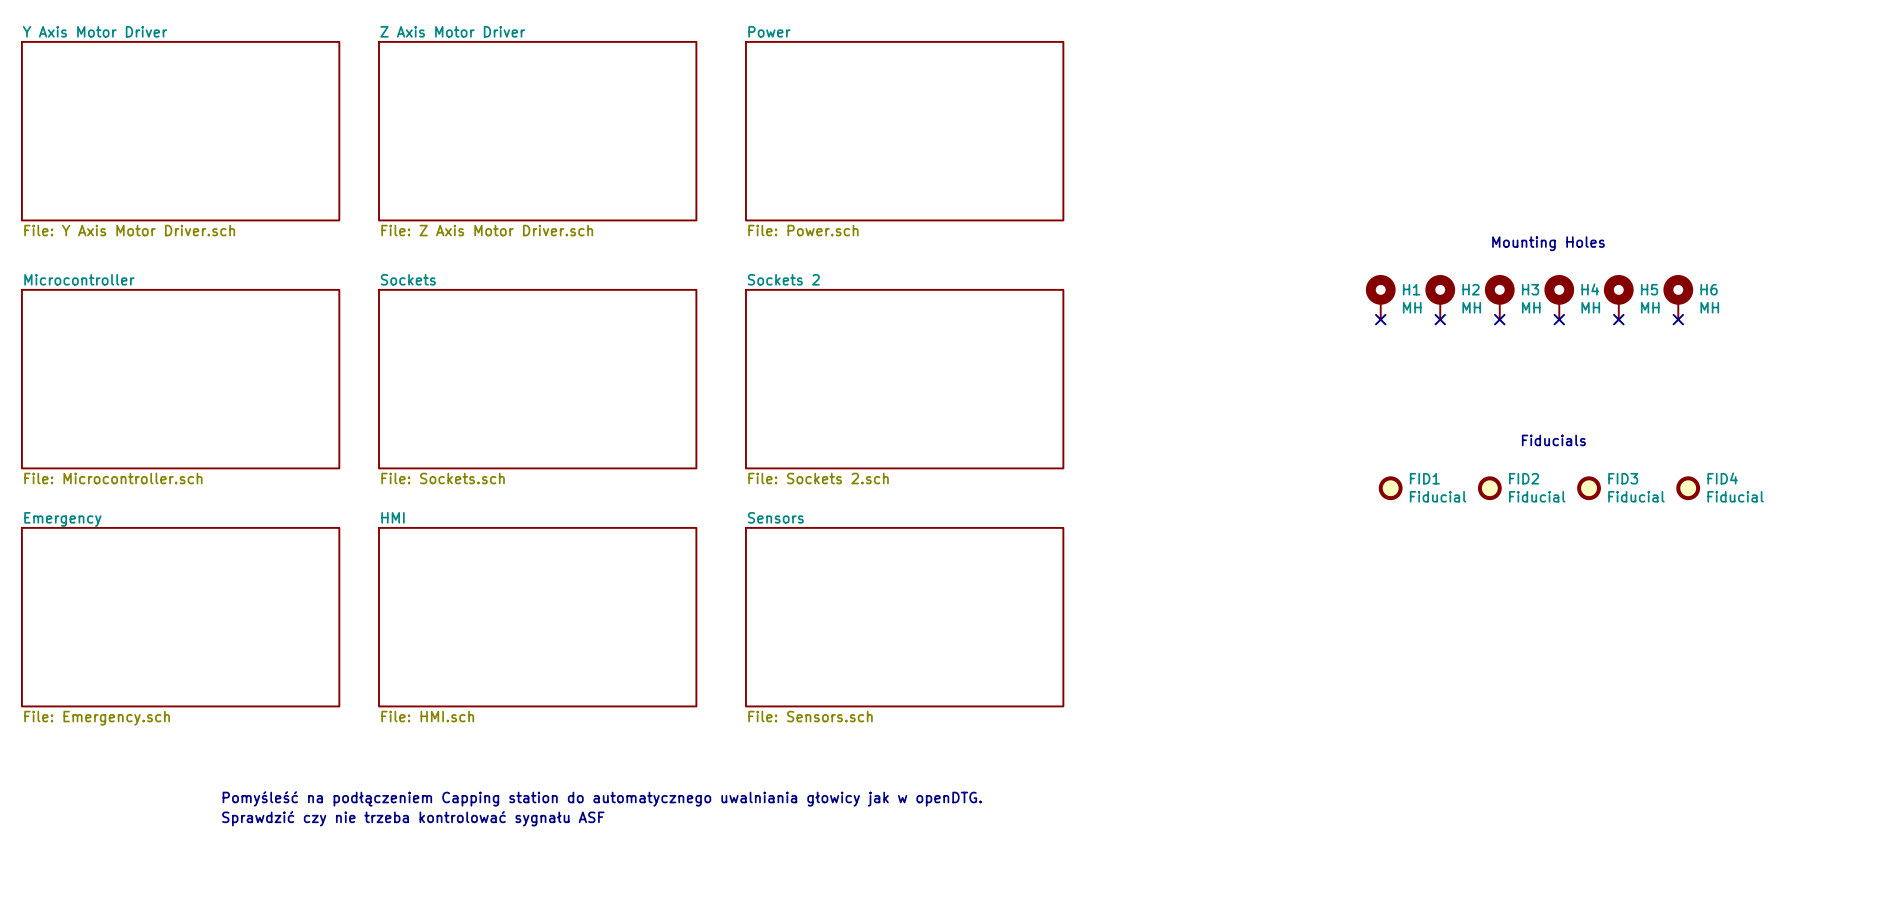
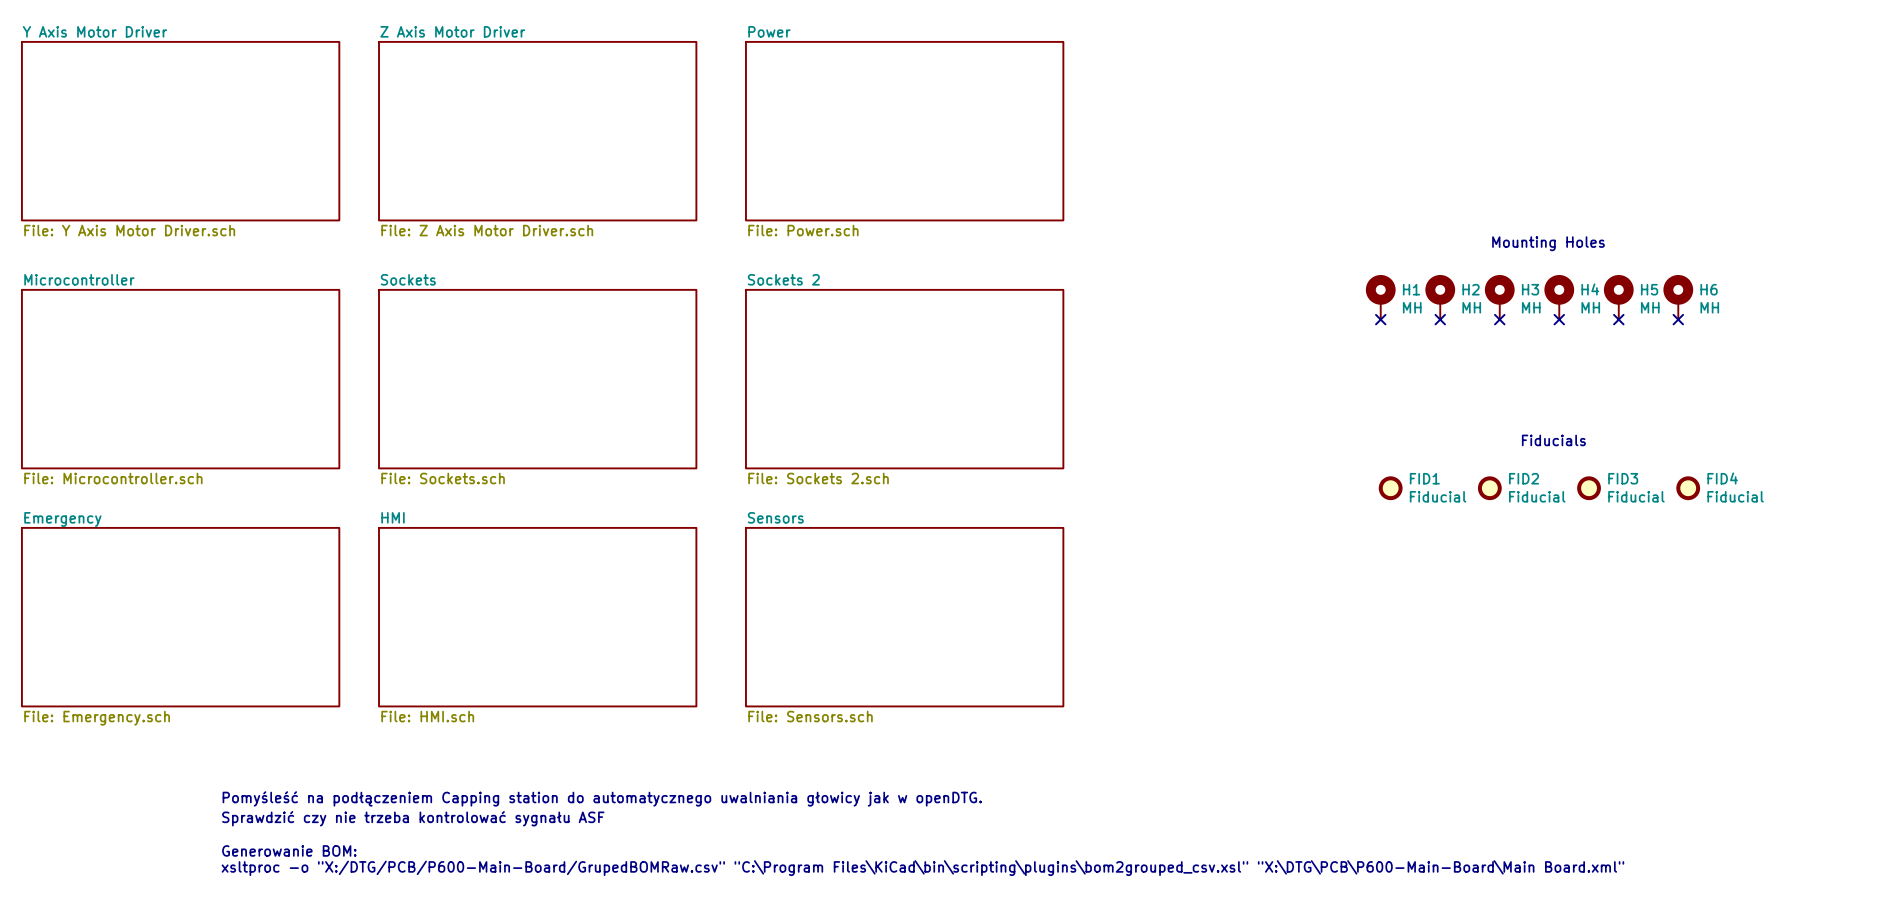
text: none -> Generowanie BOM: (289, 850)
text: none -> xsltproc -o "X:/DTG/PCB/P600-Main-Board/GrupedBOMRaw.csv" "C:\Program Files\KiCad\bin\scripting\plugins\bom2grouped_csv.xsl" "X:\DTG\PCB\P600-Main-Board\Main Board.xml" (922, 868)

